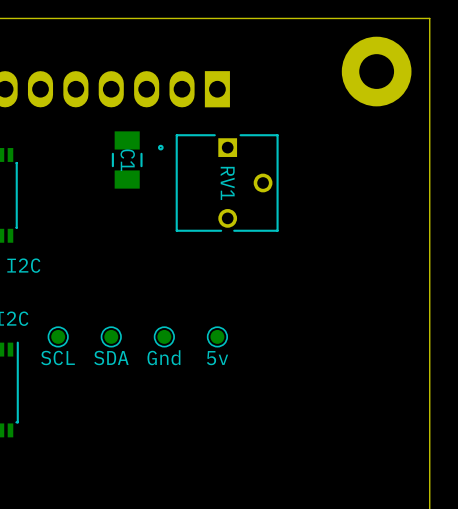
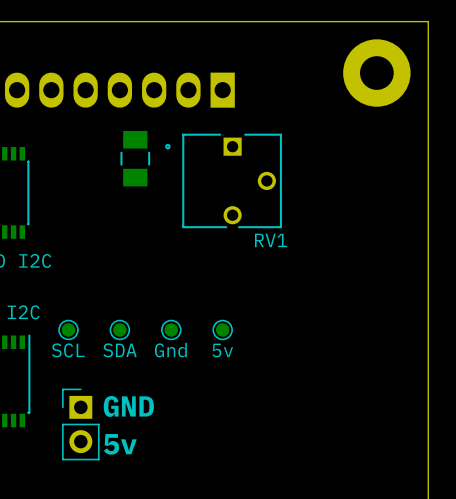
C1 name: C1 (127, 160) -> none
RV1 name rotation: 0° (227, 183) -> 90° counterclockwise (271, 240)
RV1 name position: RV1 (227, 183) -> RV1 (271, 240)
text: none -> GND (128, 406)
part: none -> (80, 424)
text: none -> 5v (120, 444)

